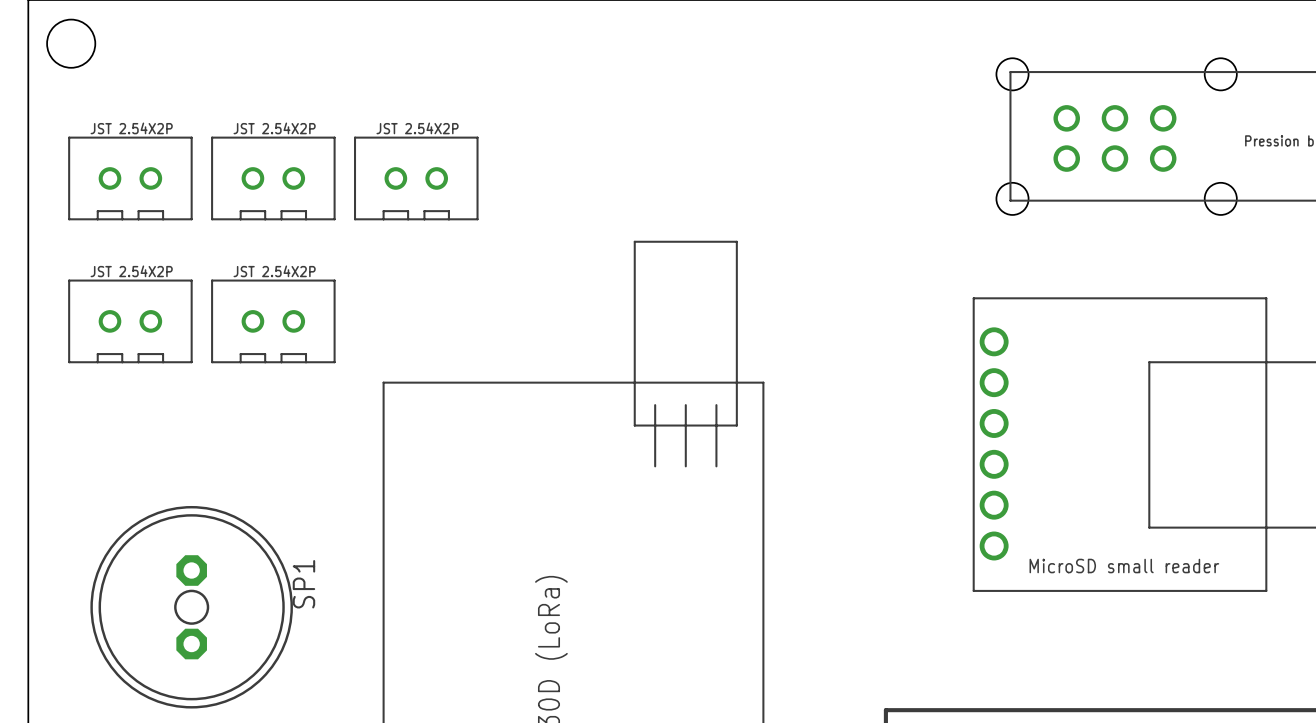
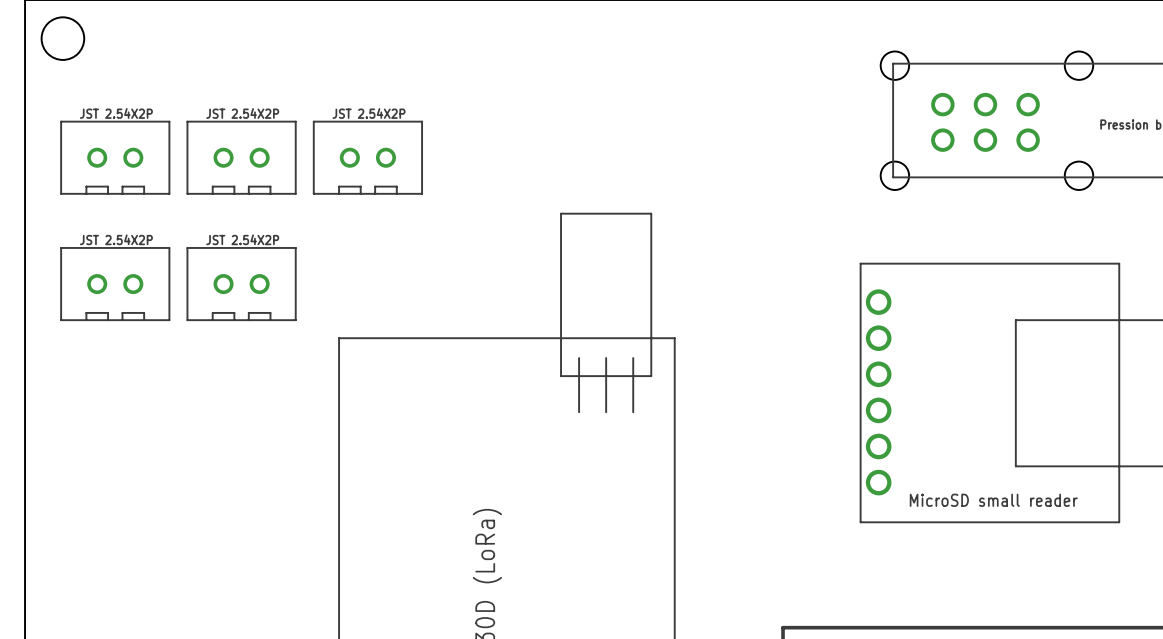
SP1: (191, 607) -> none

